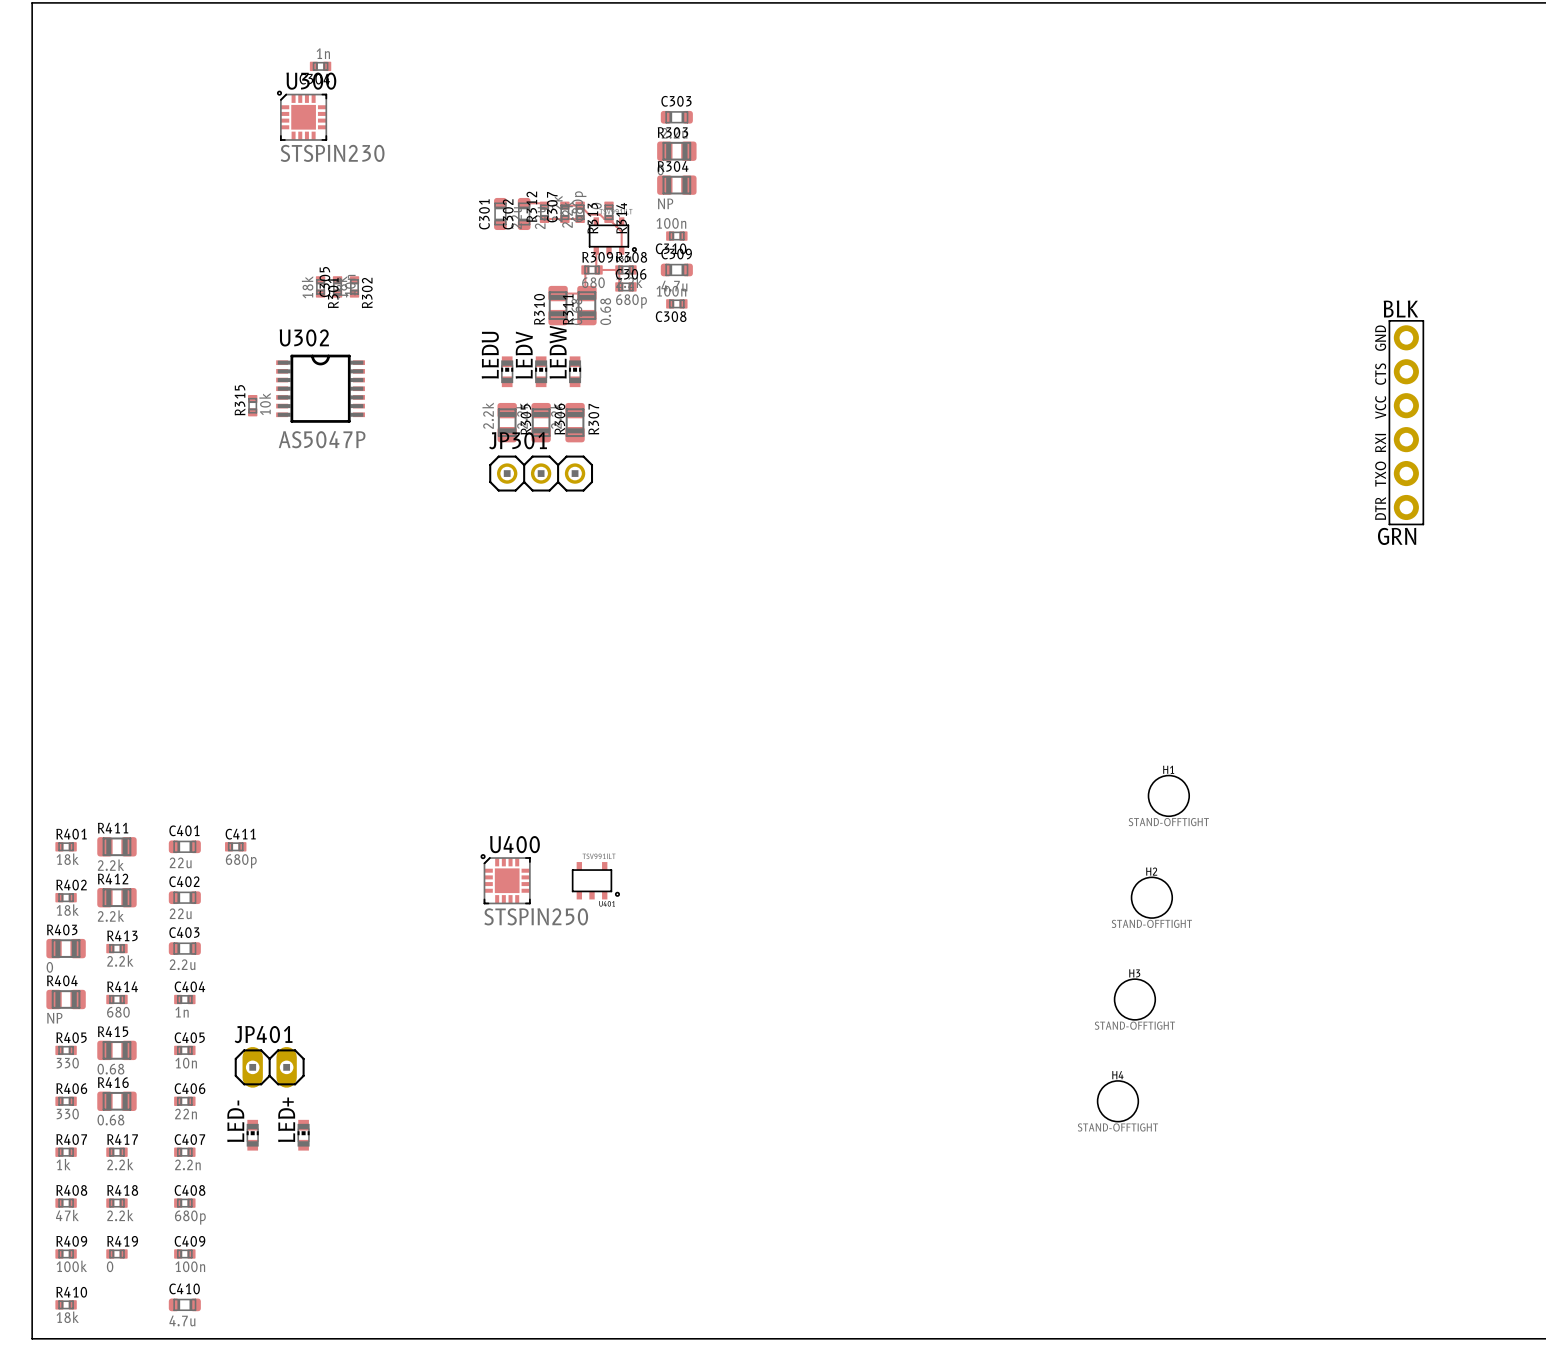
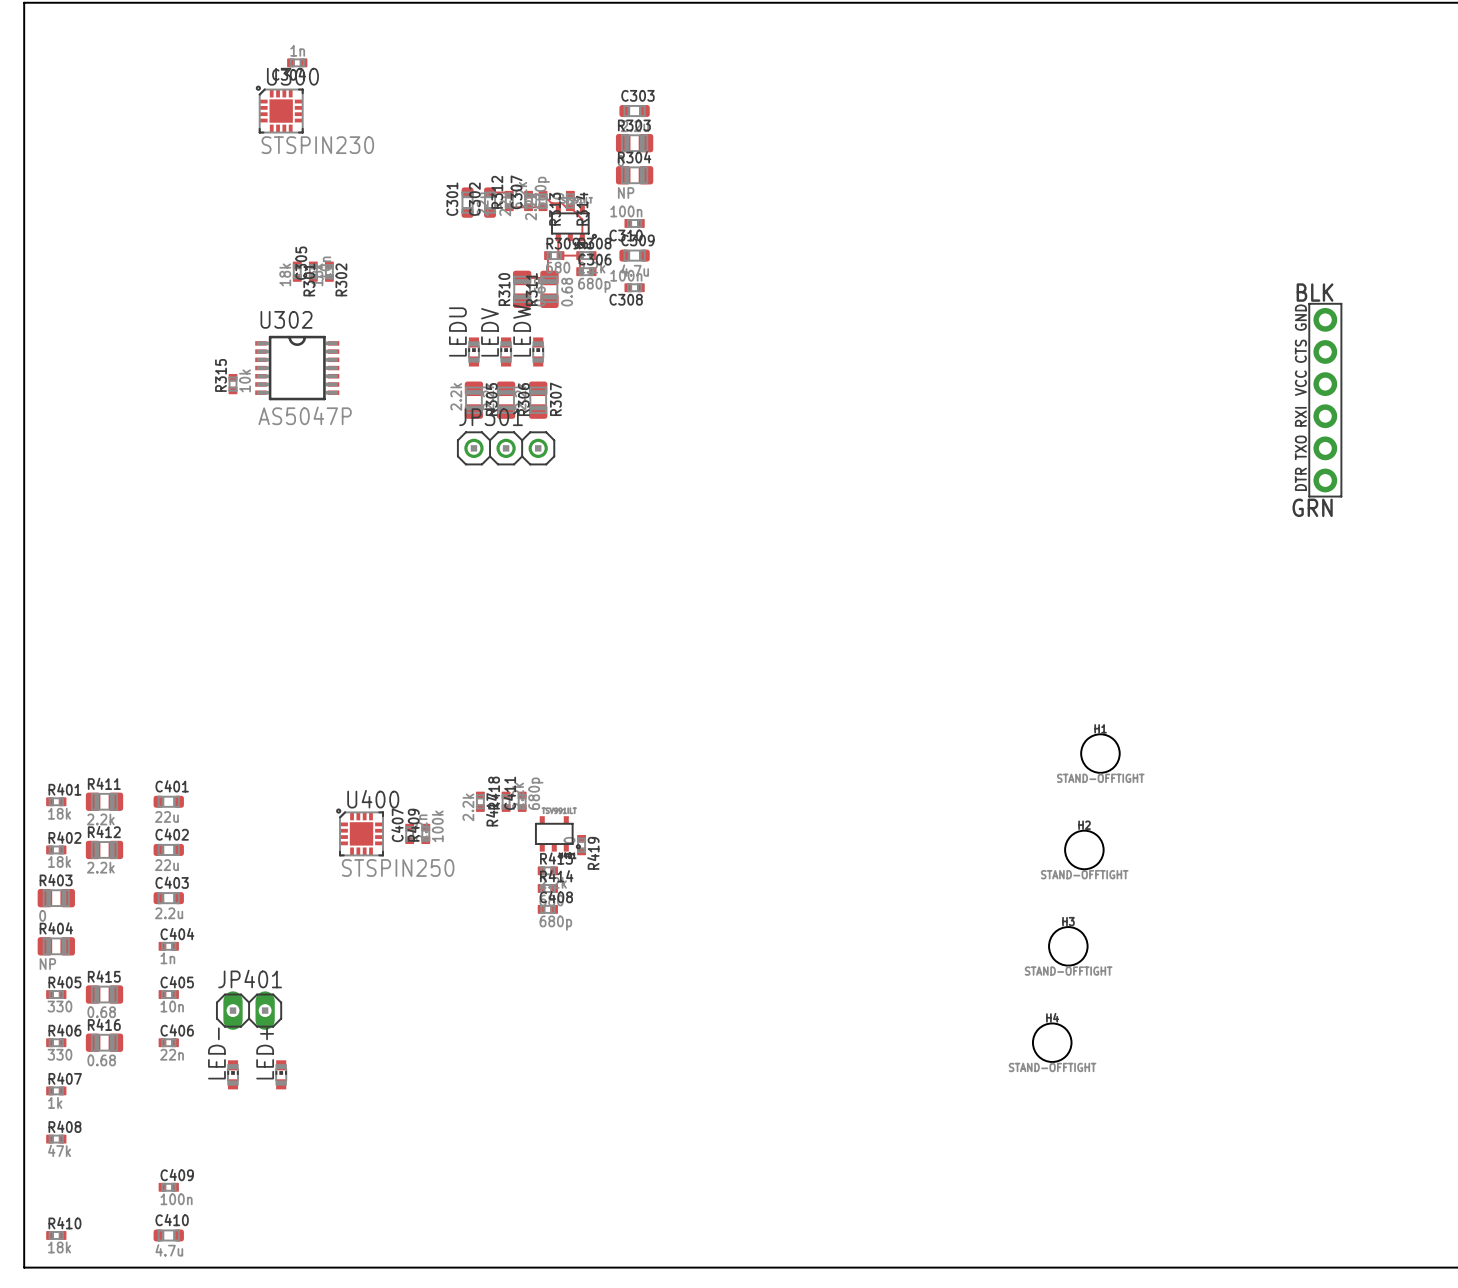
C411 rotation: 0° (235, 846) -> 90° clockwise (522, 801)
C411 position: (235, 846) -> (522, 801)
U400 position: (505, 879) -> (360, 832)
R413 position: (116, 948) -> (547, 870)
R414 position: (116, 999) -> (547, 888)
R417 rotation: 0° (116, 1152) -> 90° clockwise (480, 801)
R417 position: (116, 1152) -> (480, 801)
C407 rotation: 0° (184, 1152) -> 90° clockwise (409, 833)
C407 position: (184, 1152) -> (409, 833)
R418 rotation: 0° (116, 1203) -> 90° clockwise (506, 801)
R418 position: (116, 1203) -> (506, 801)
C408 position: (184, 1203) -> (547, 909)
R409 rotation: 0° (66, 1253) -> 90° clockwise (425, 833)
R409 position: (66, 1253) -> (425, 833)
R419 rotation: 0° (116, 1253) -> 90° clockwise (581, 845)
R419 position: (116, 1253) -> (581, 845)

